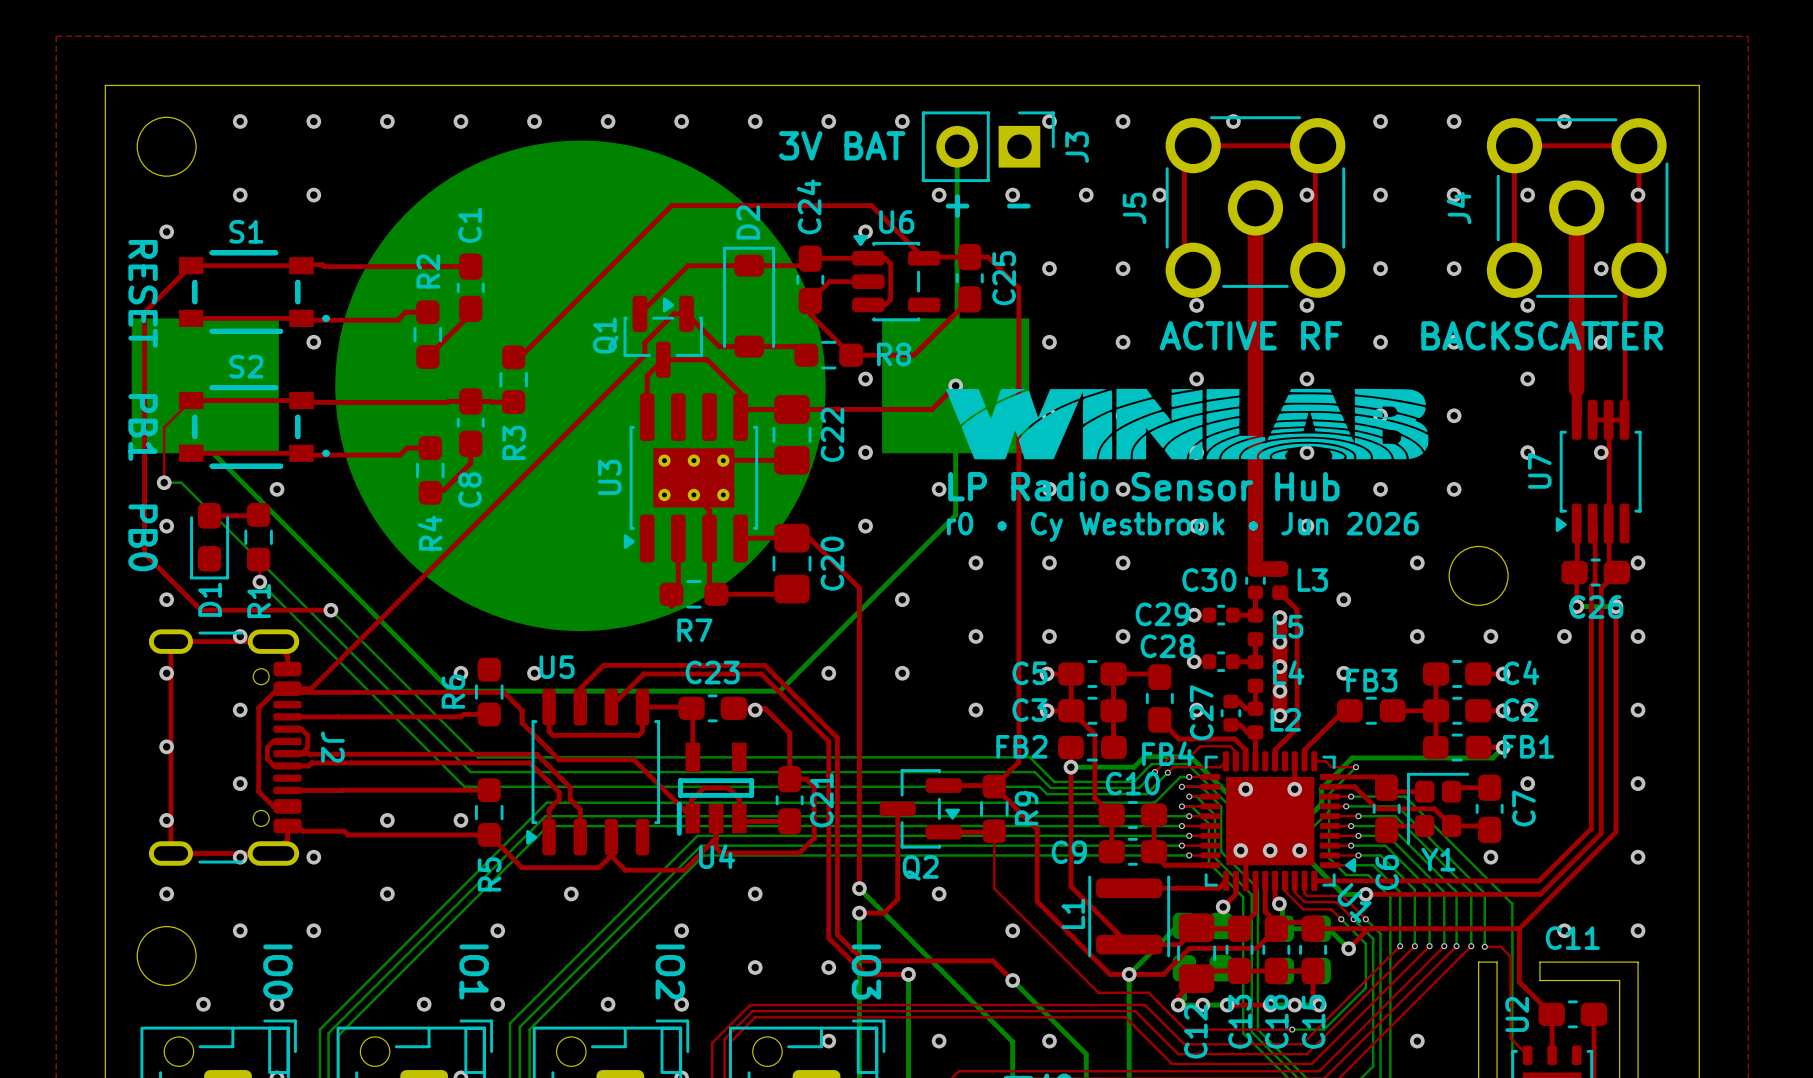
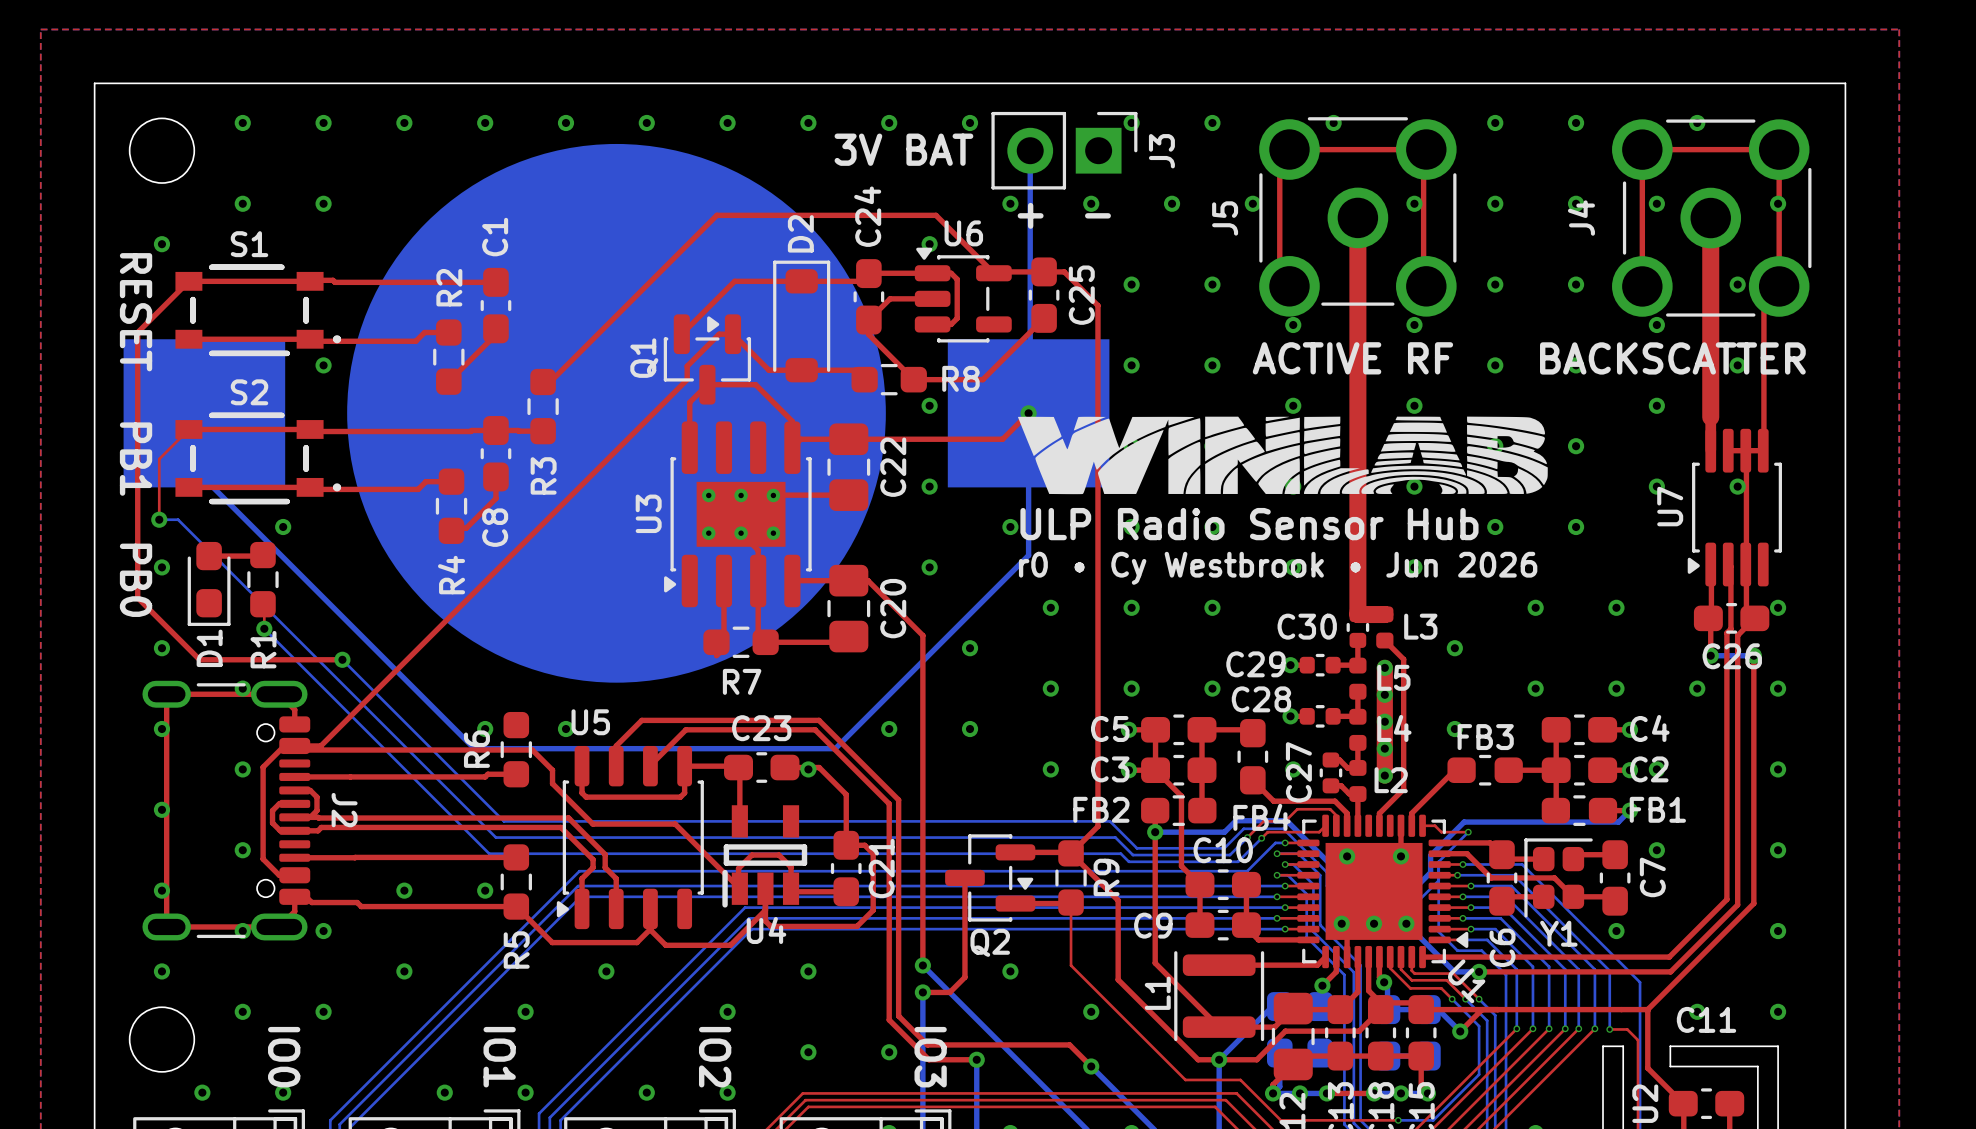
text: LP Radio Sensor Hub (1143, 486) -> ULP Radio Sensor Hub (1249, 524)
round board edge: [1448, 545, 1509, 606] -> none
via: none -> (1616, 607)

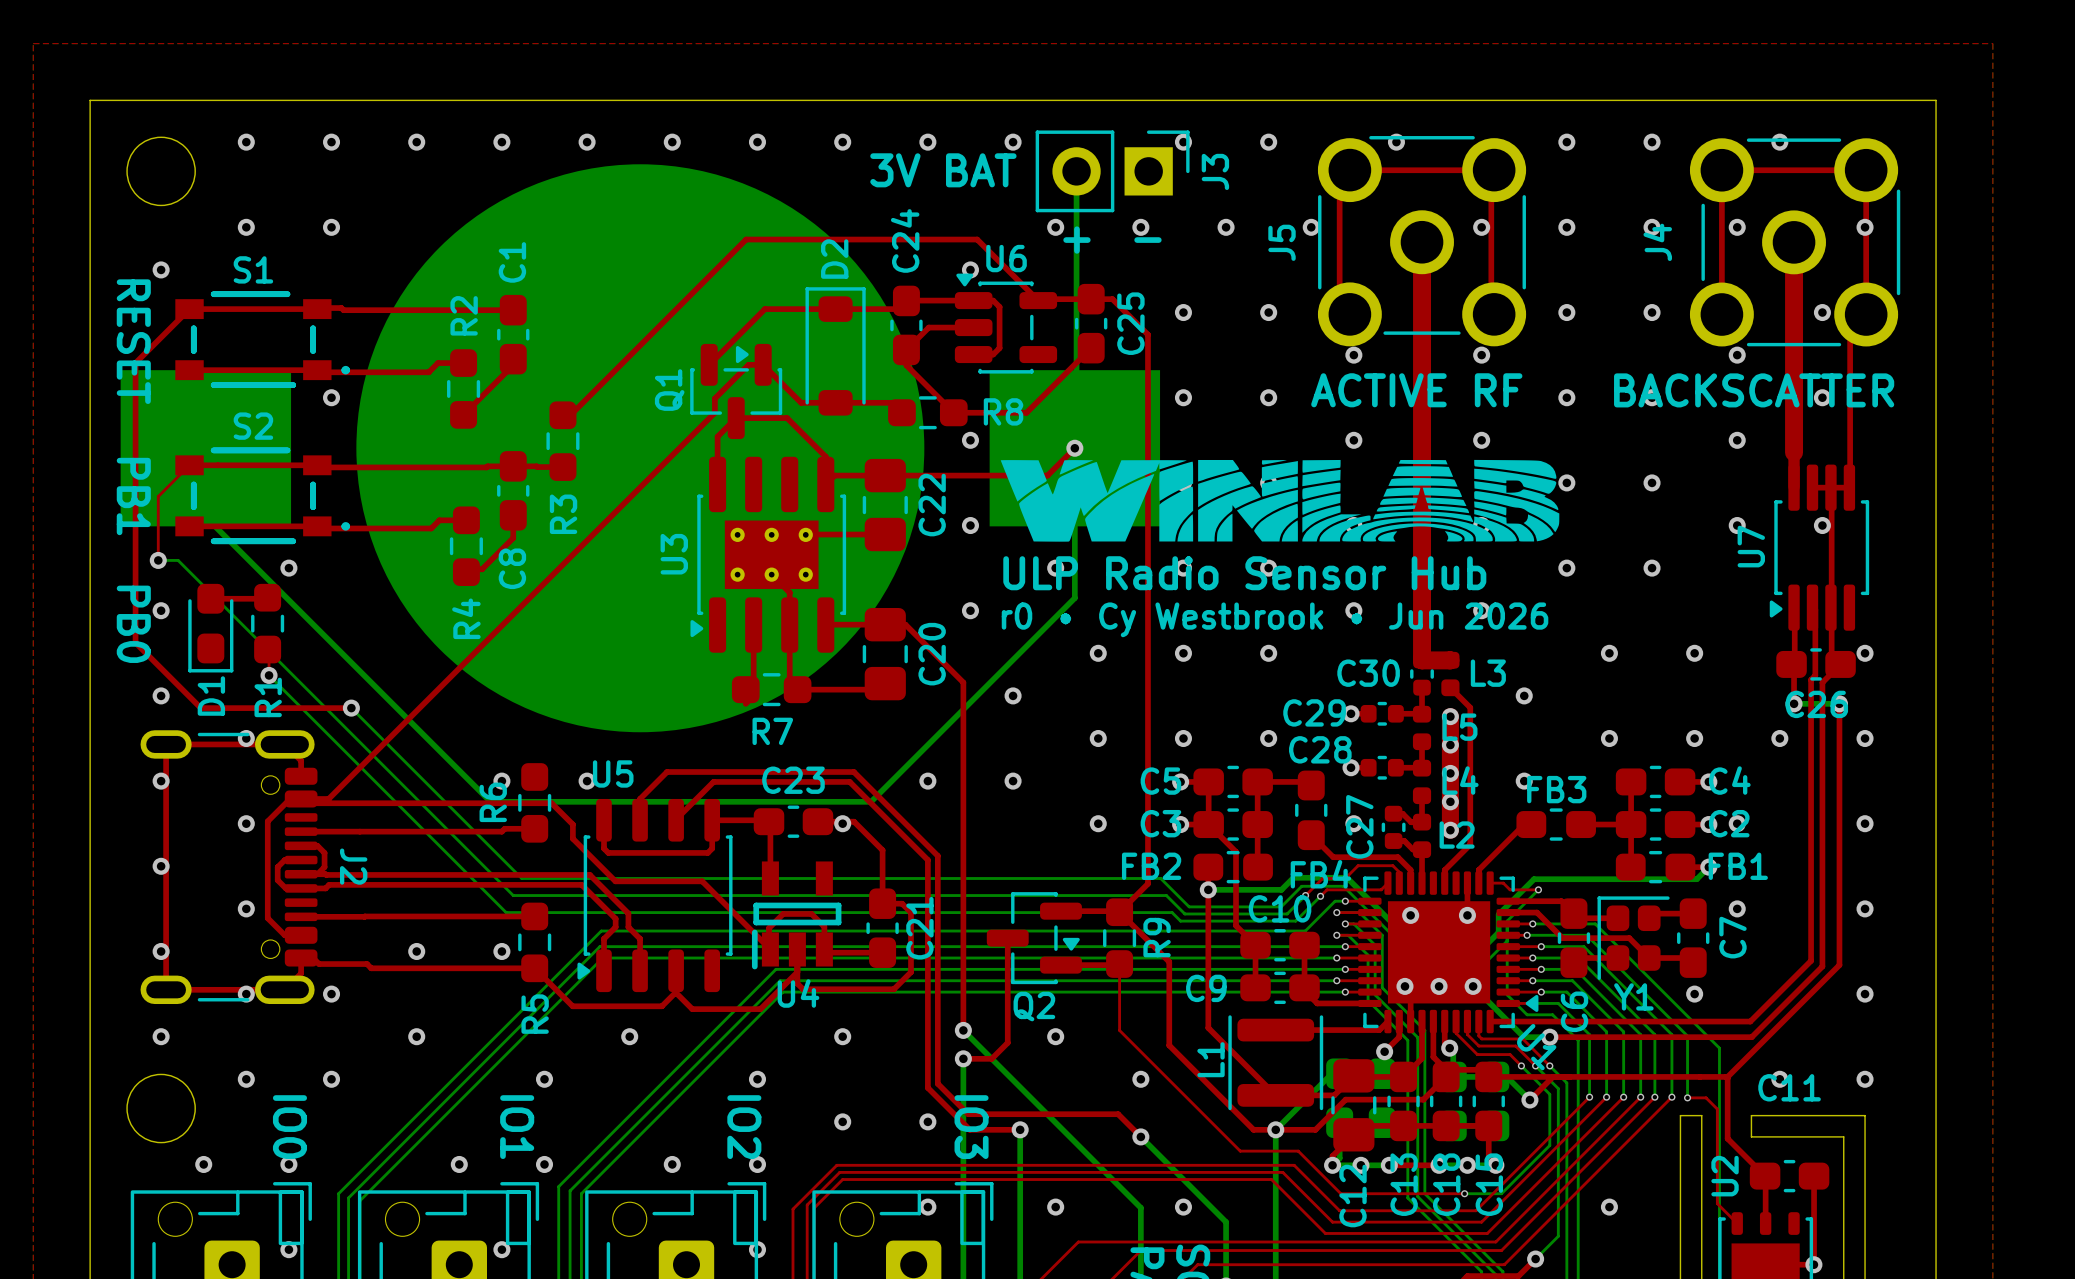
drawing position: (1282, 455) -> (1280, 500)
text position: ULP Radio Sensor Hub (1249, 524) -> ULP Radio Sensor Hub (1244, 573)
text position: r0 • Cy Westbrook • Jun 2026 (1278, 568) -> r0 • Cy Westbrook • Jun 2026 (1275, 619)

